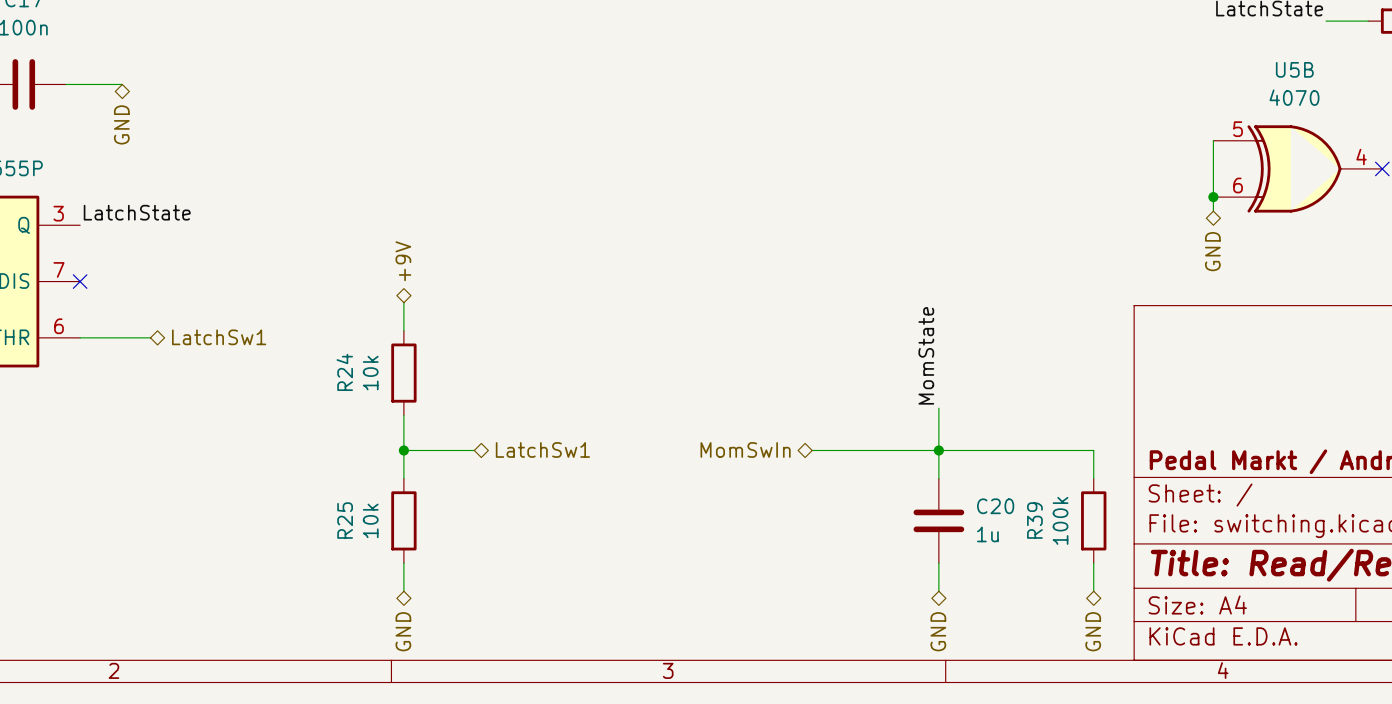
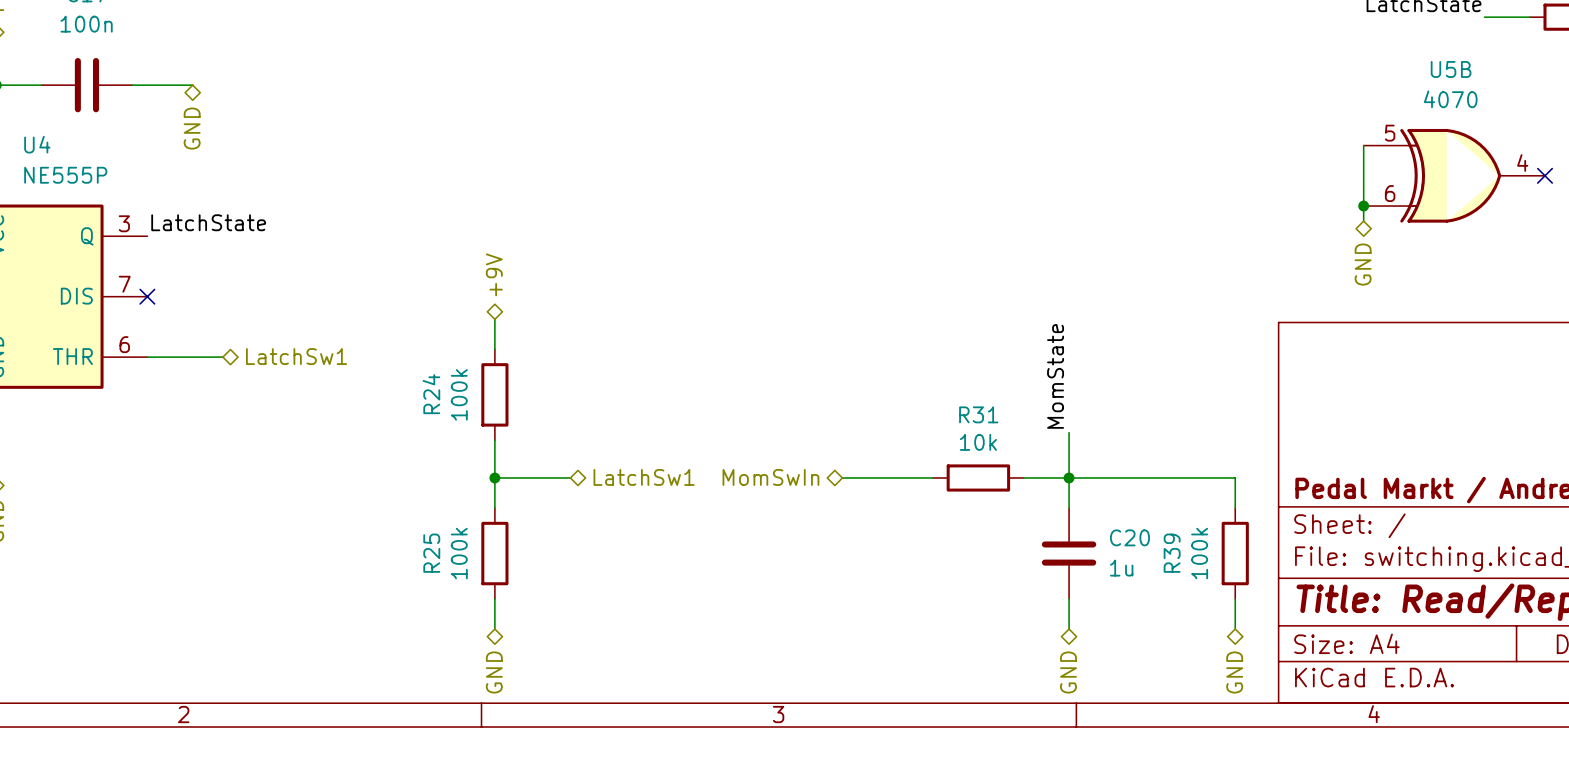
R24 value: 10k (370, 373) -> 100k (459, 394)
hierarchical label position: MomSwIn (745, 449) -> MomSwIn (770, 477)
wire: (812, 450) (896, 450) -> (933, 477) (842, 477)
R31: none -> 10k (978, 477)
R25 value: 10k (370, 520) -> 100k (459, 553)

